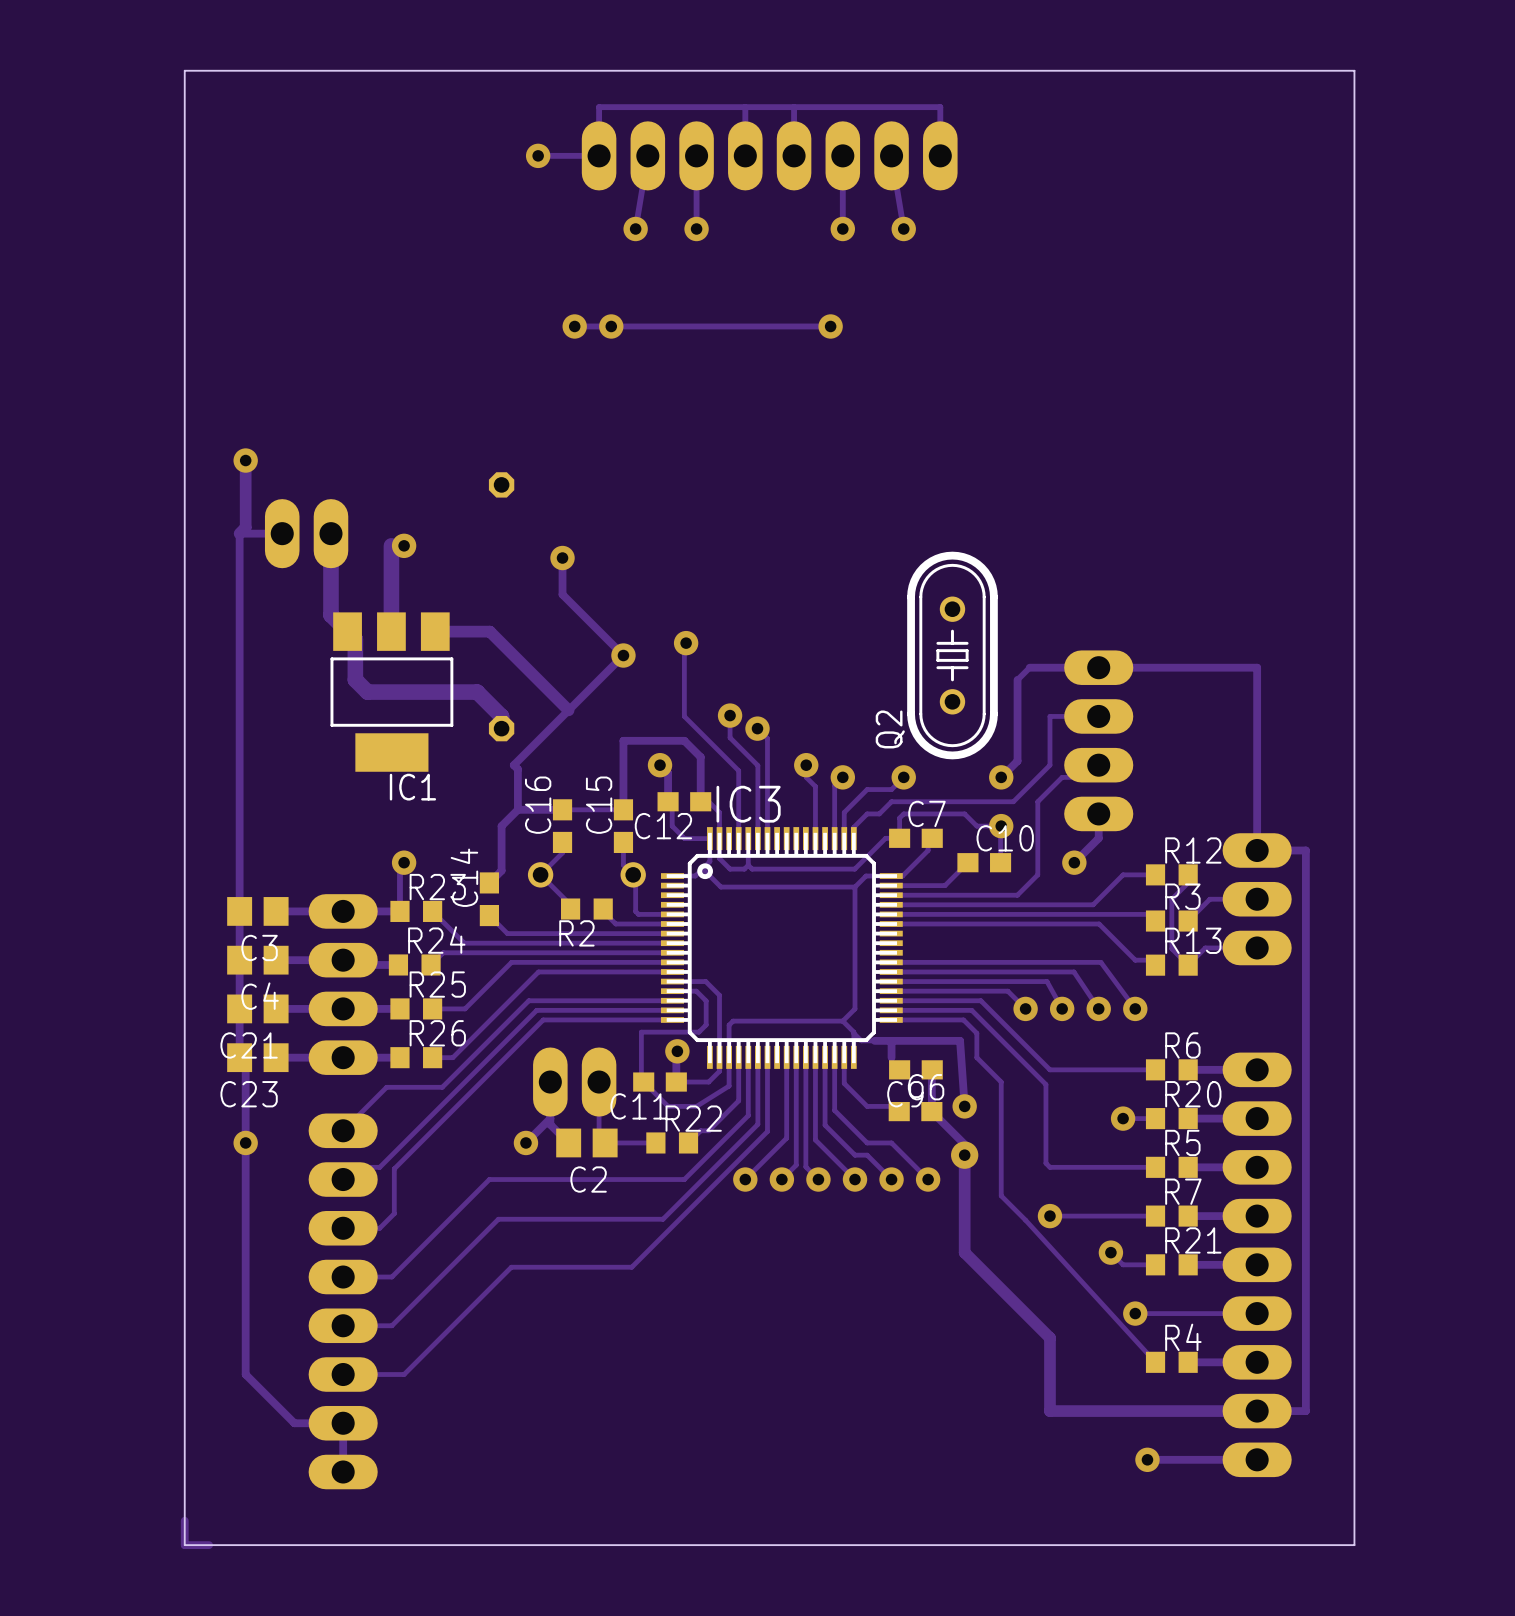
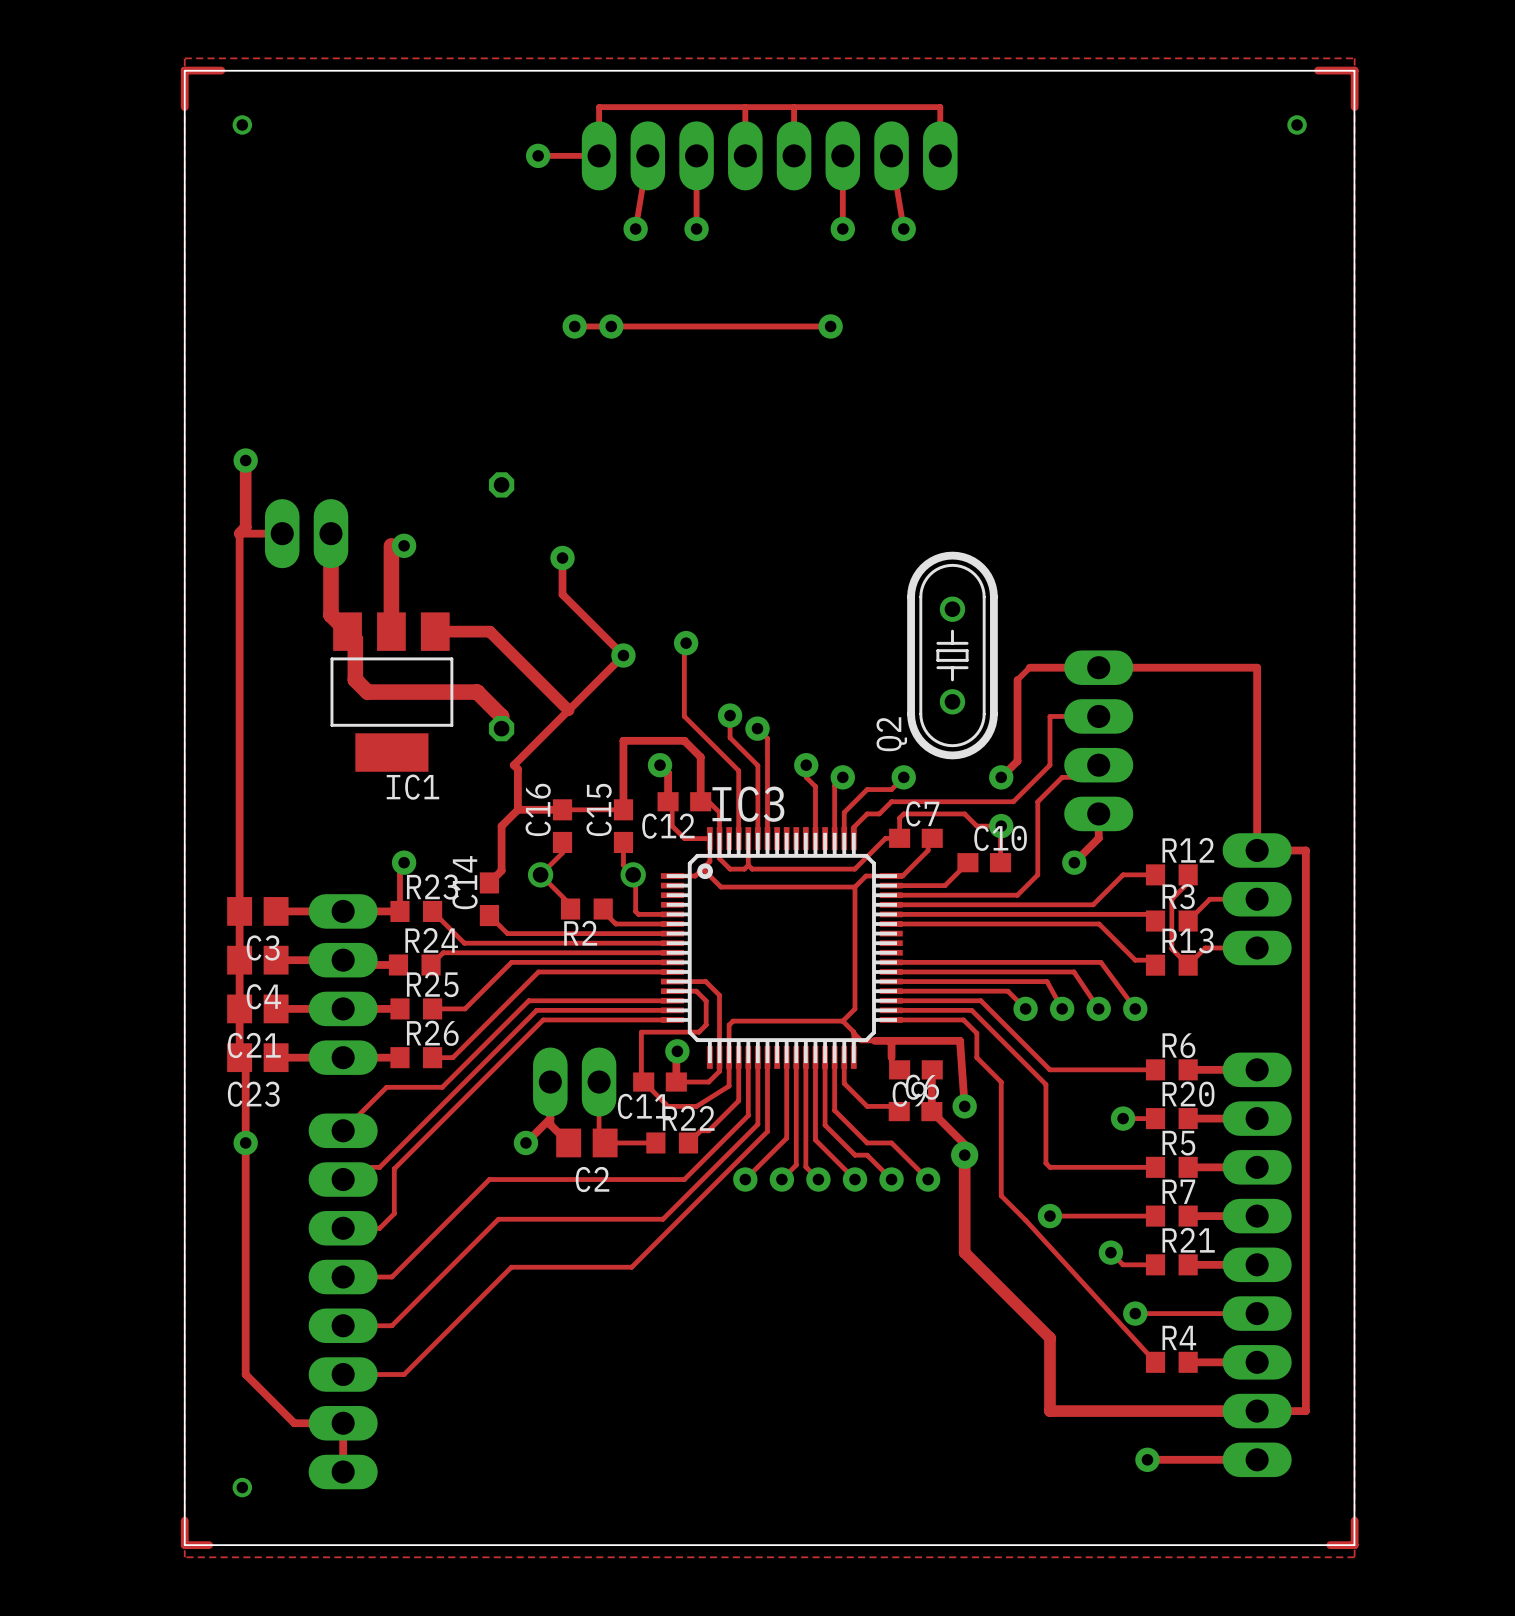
zone outline: none -> (184, 58) (1354, 58) (1354, 1557) (184, 1557) (184, 58)
track: none -> (221, 70) (184, 70) (184, 107)
track: none -> (1318, 70) (1354, 70) (1354, 107)
via: none -> (242, 124)
via: none -> (1297, 124)
via: none -> (242, 1487)
track: none -> (1354, 1520) (1354, 1545) (1330, 1545)

